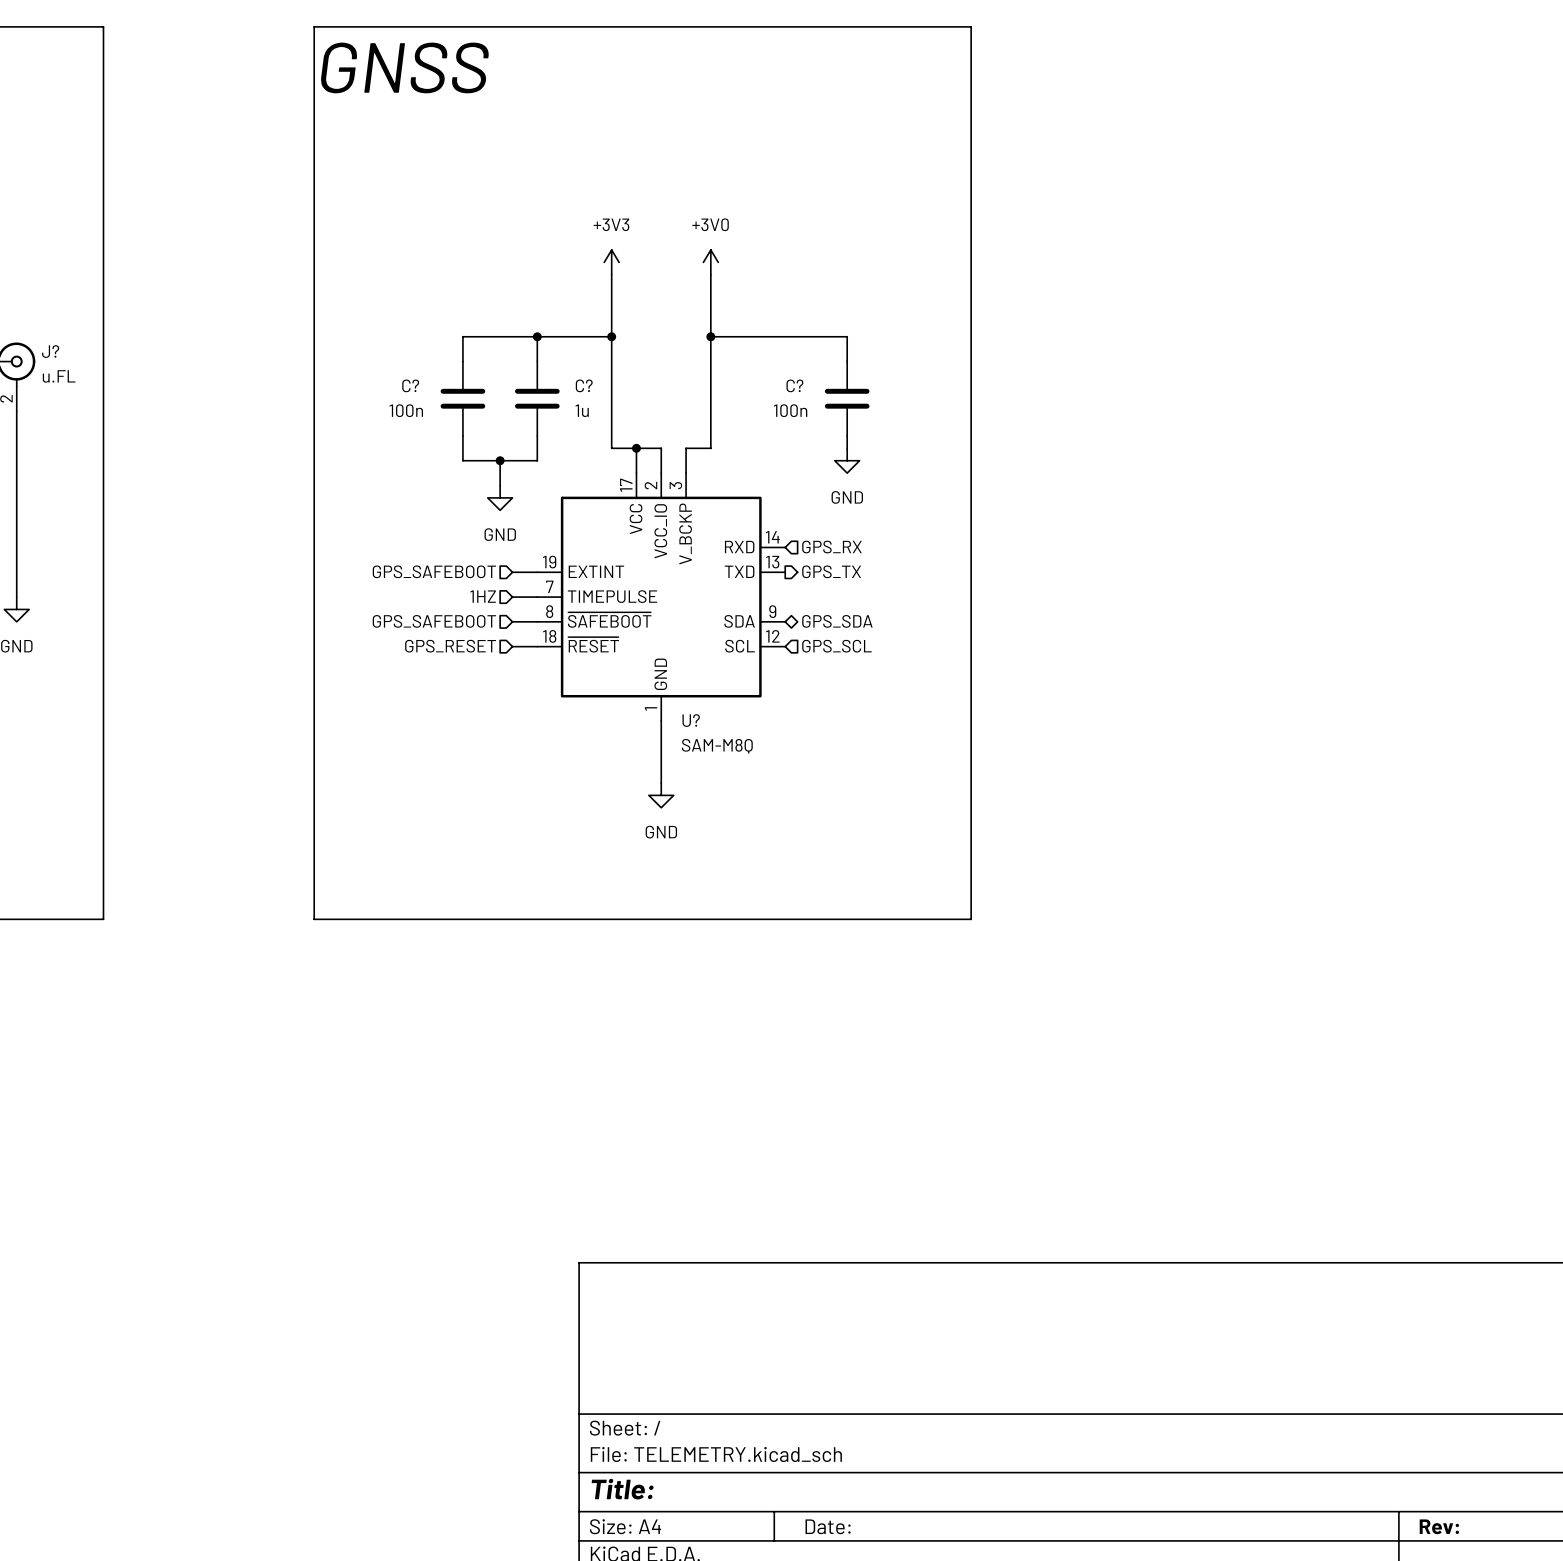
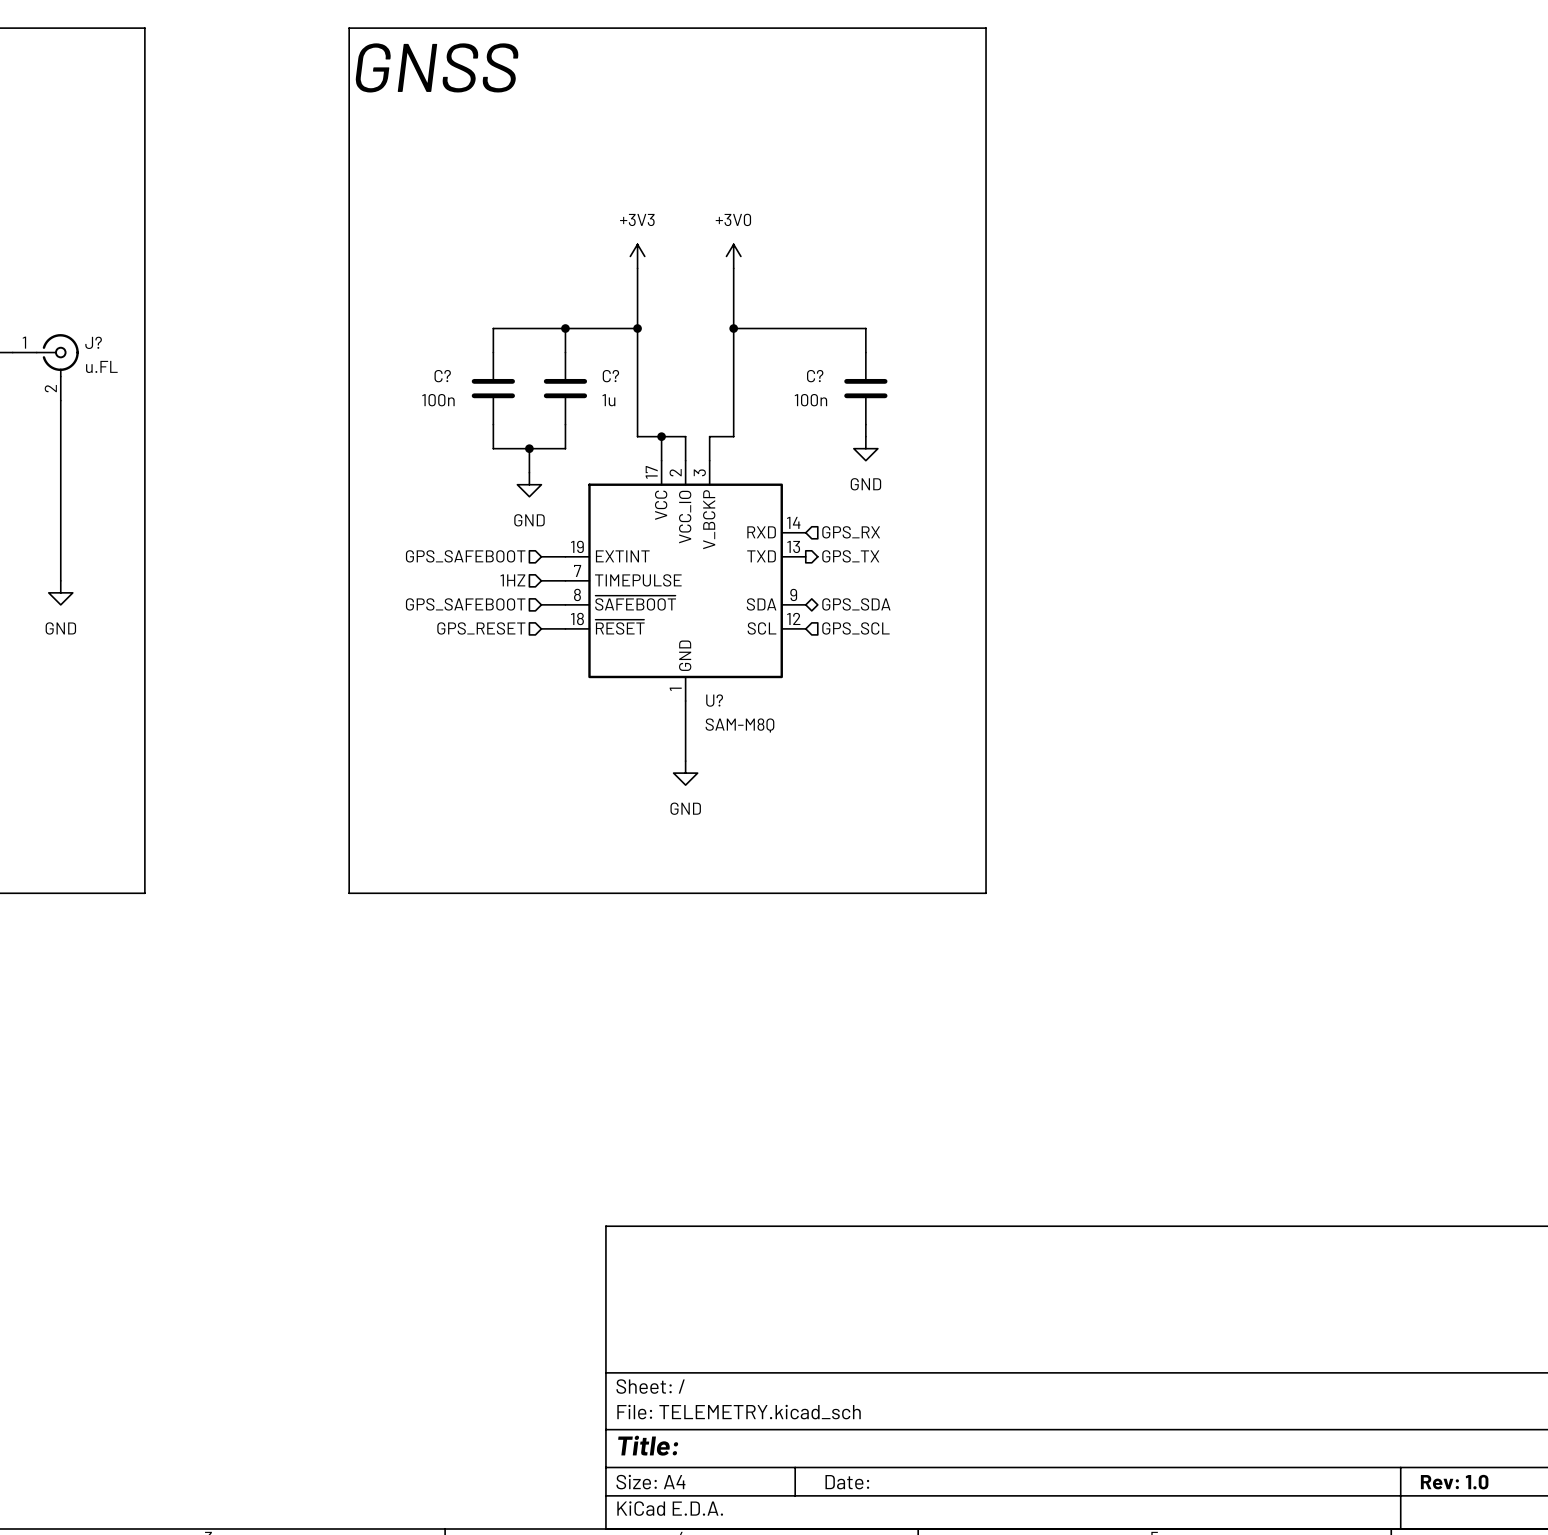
title block: Rev: (1439, 1526) -> Rev: 1.0 (1454, 1482)

